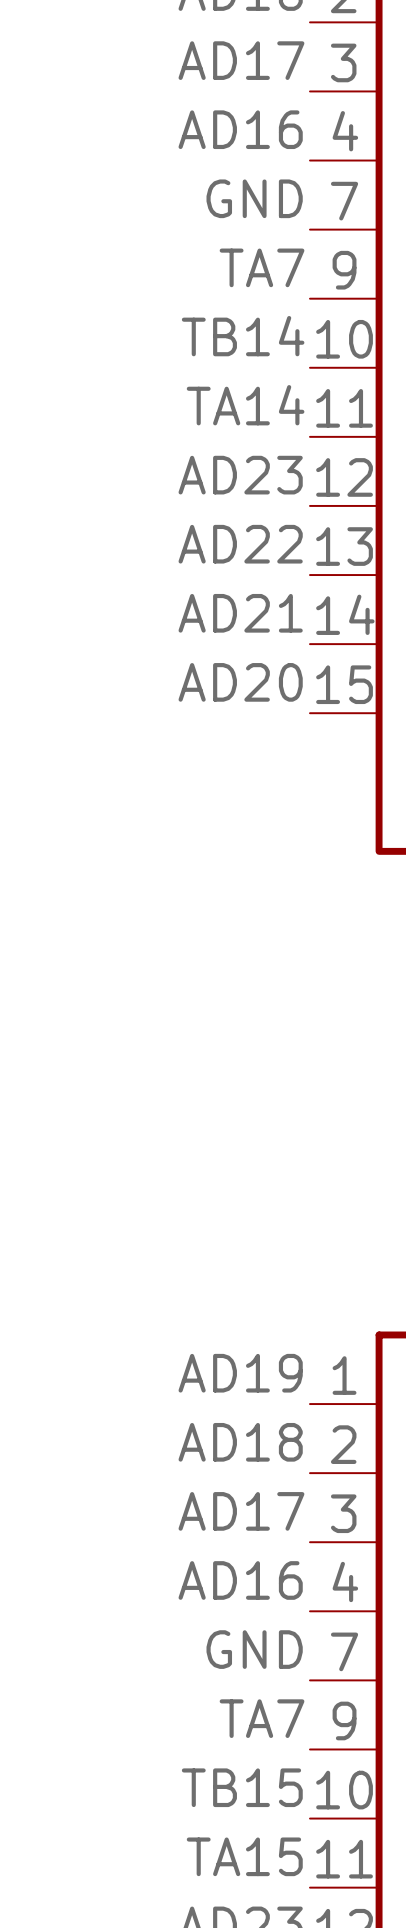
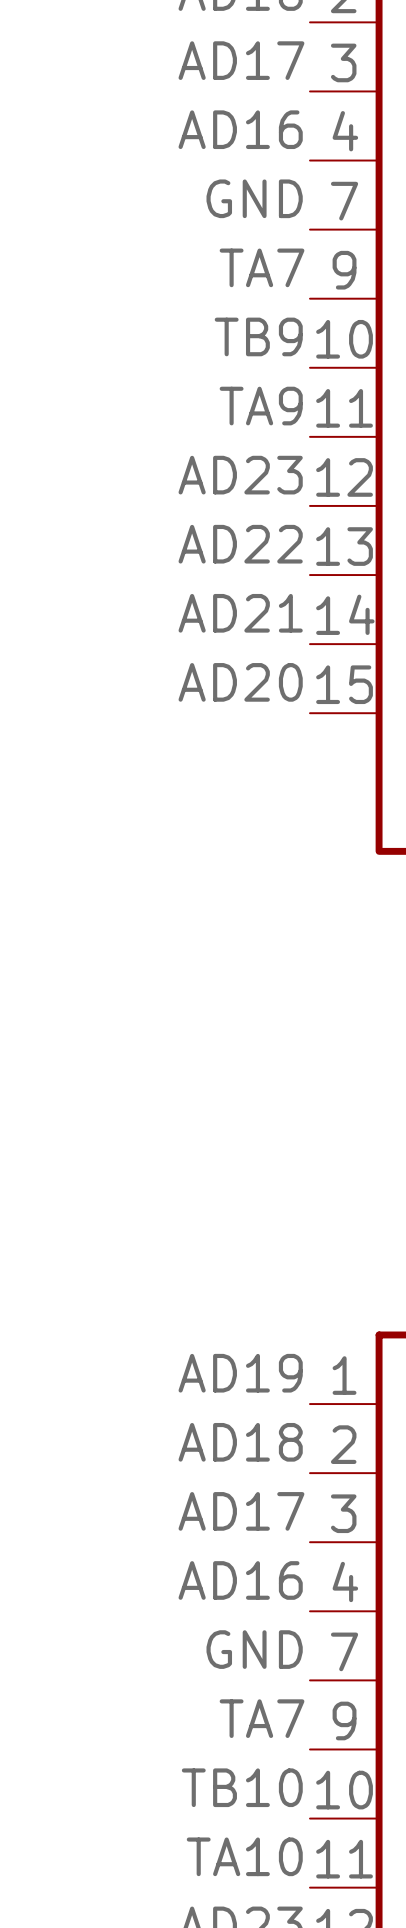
label: TB14 (243, 336) -> TB9 (258, 336)
label: TA14 (245, 405) -> TA9 (261, 406)
label: TB15 (242, 1787) -> TB10 (242, 1787)
label: TA15 (244, 1856) -> TA10 (244, 1856)

